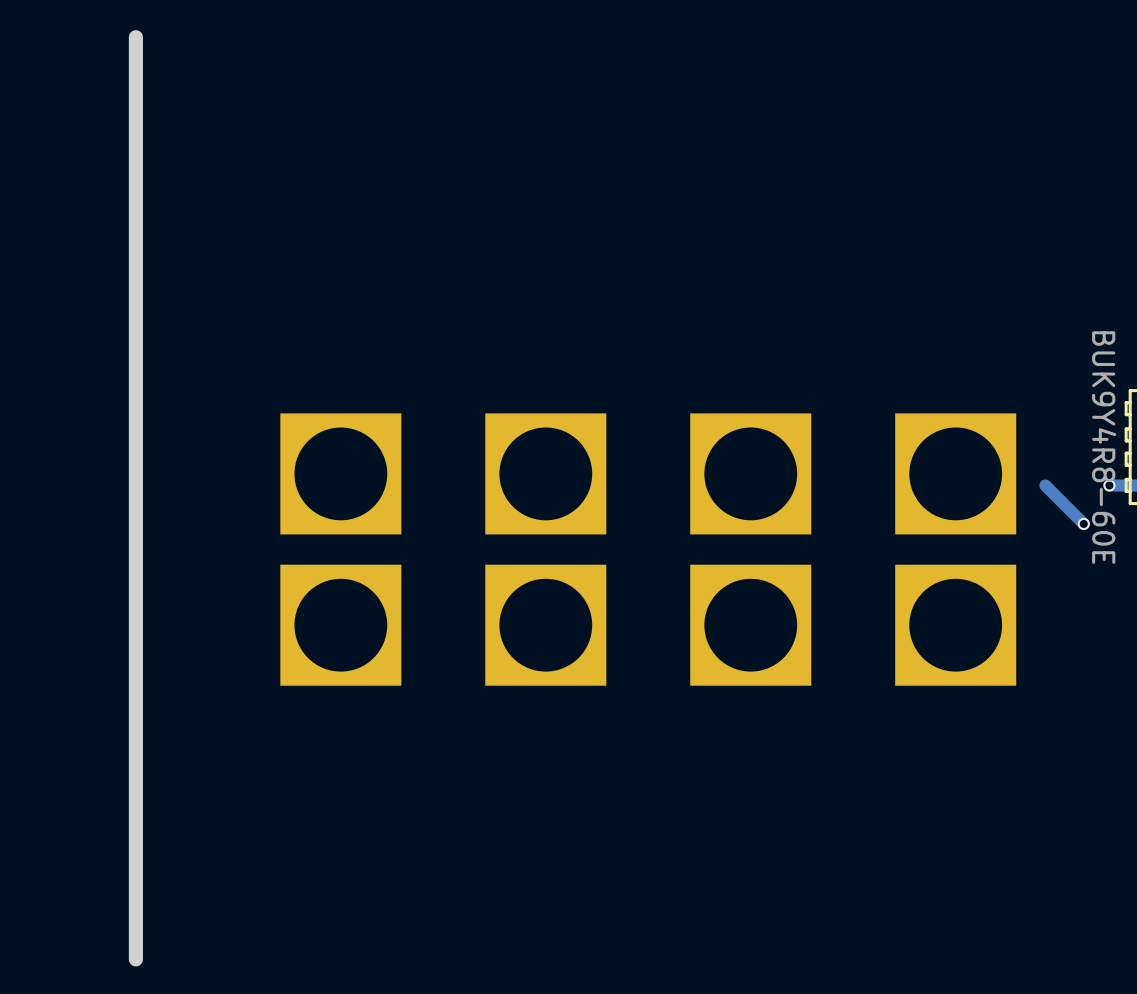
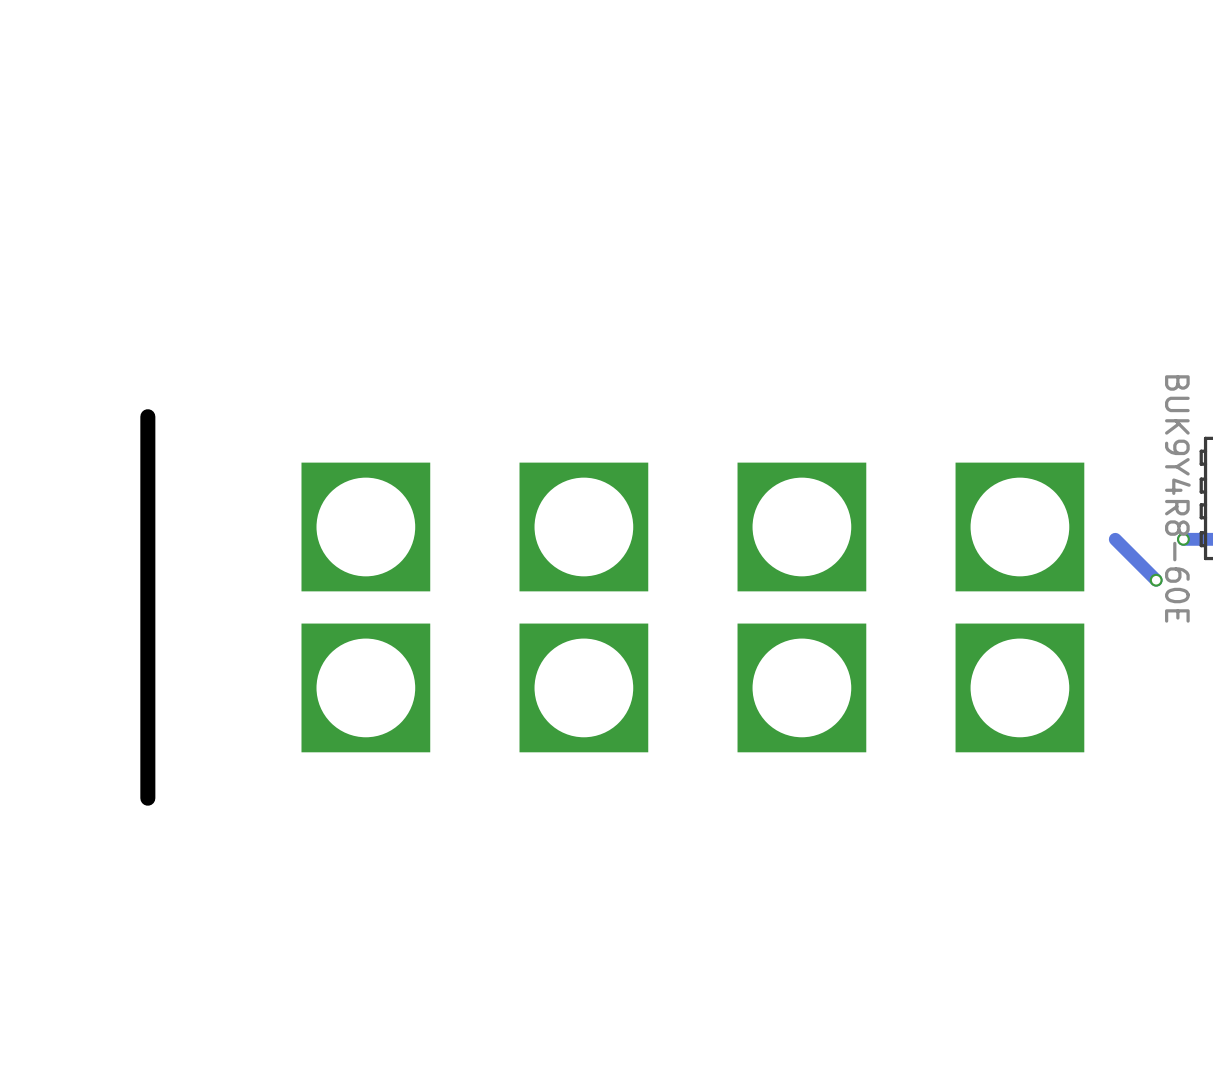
board edge: (135, 37) (135, 370) -> none
board edge: (135, 728) (135, 959) -> none

